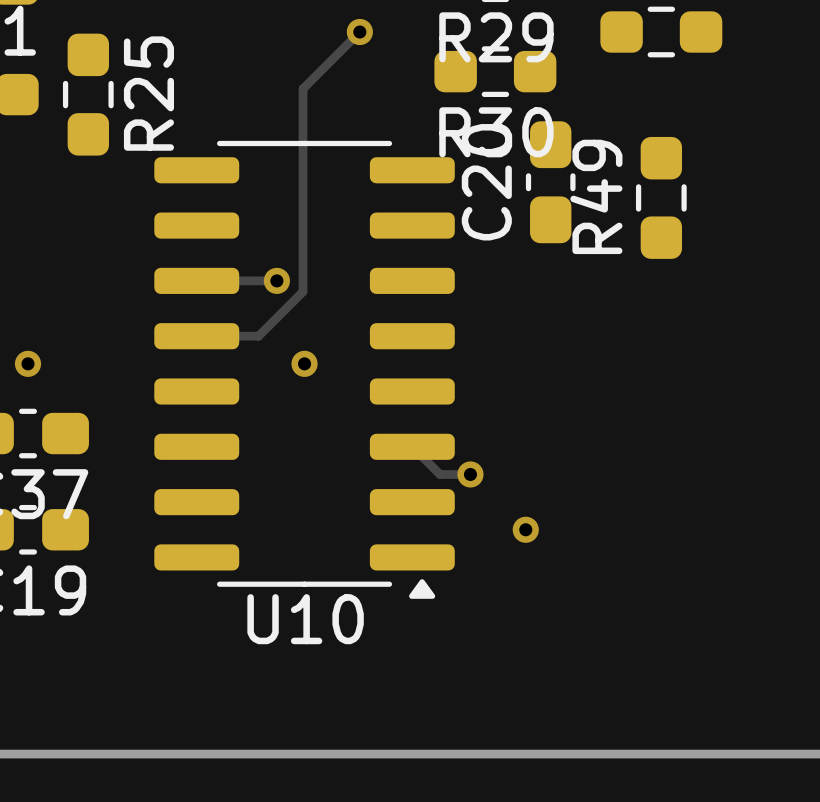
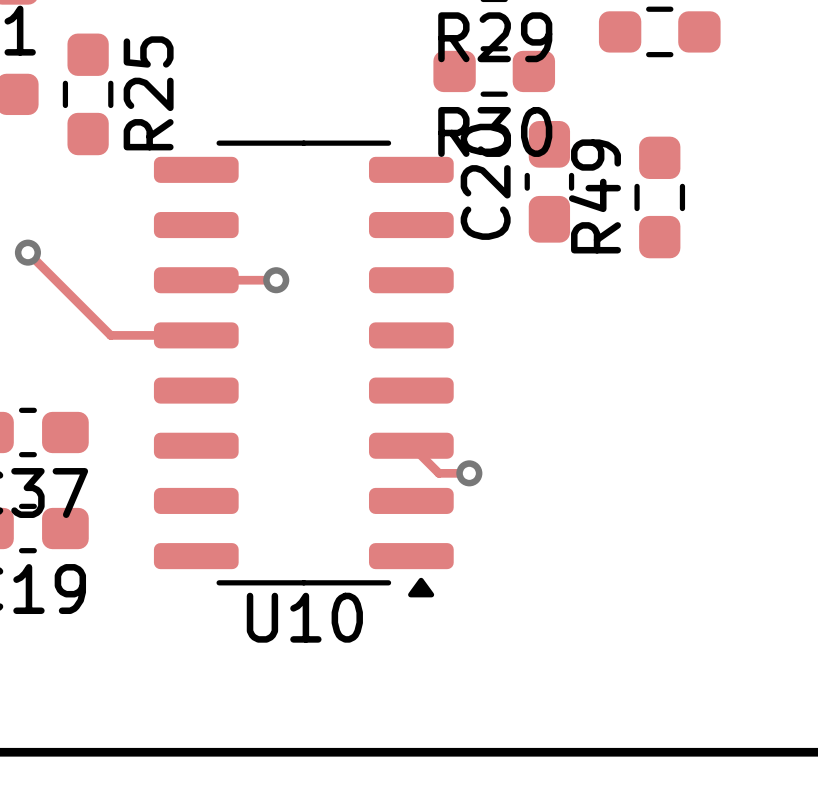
track: (359, 32) (303, 88) (303, 291) (258, 336) (221, 336) -> none
via: (359, 32) -> none
track: none -> (27, 252) (110, 335) (196, 335)
via position: (28, 363) -> (27, 252)
via: (304, 363) -> none
via: (525, 529) -> none

